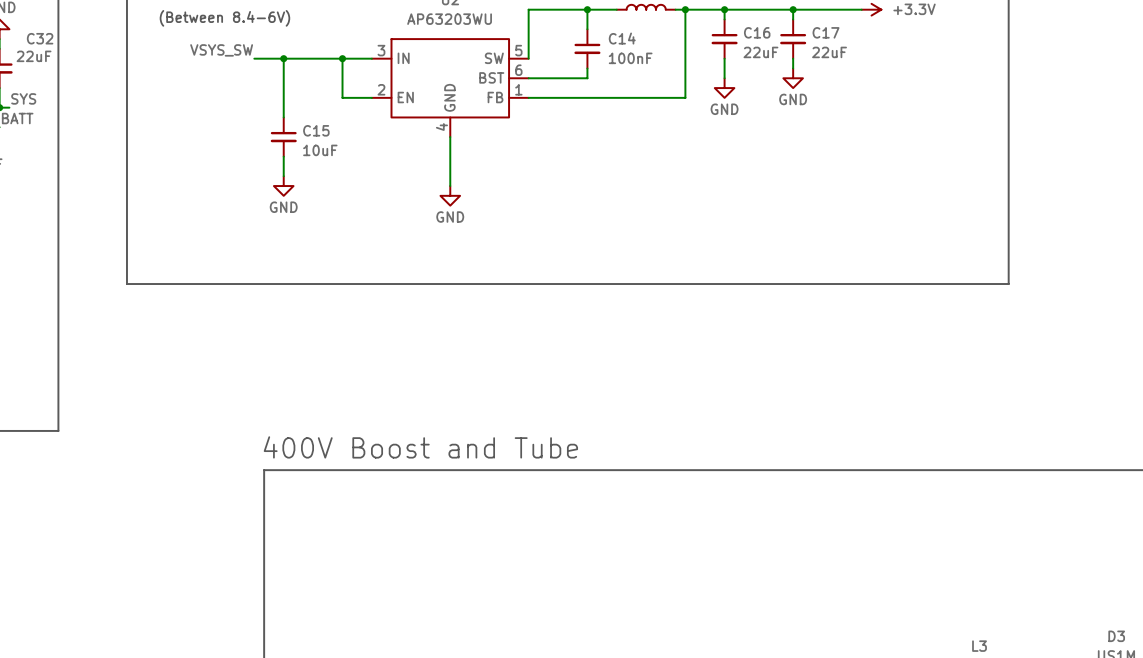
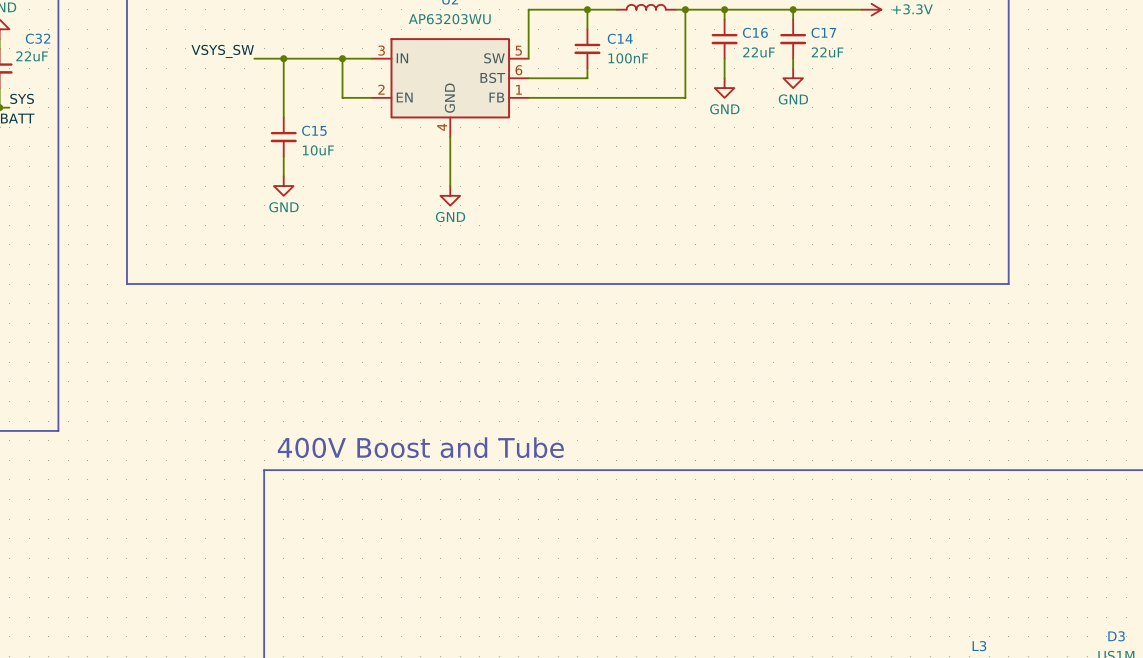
text: (Between 8.4-6V) (224, 18) -> none

